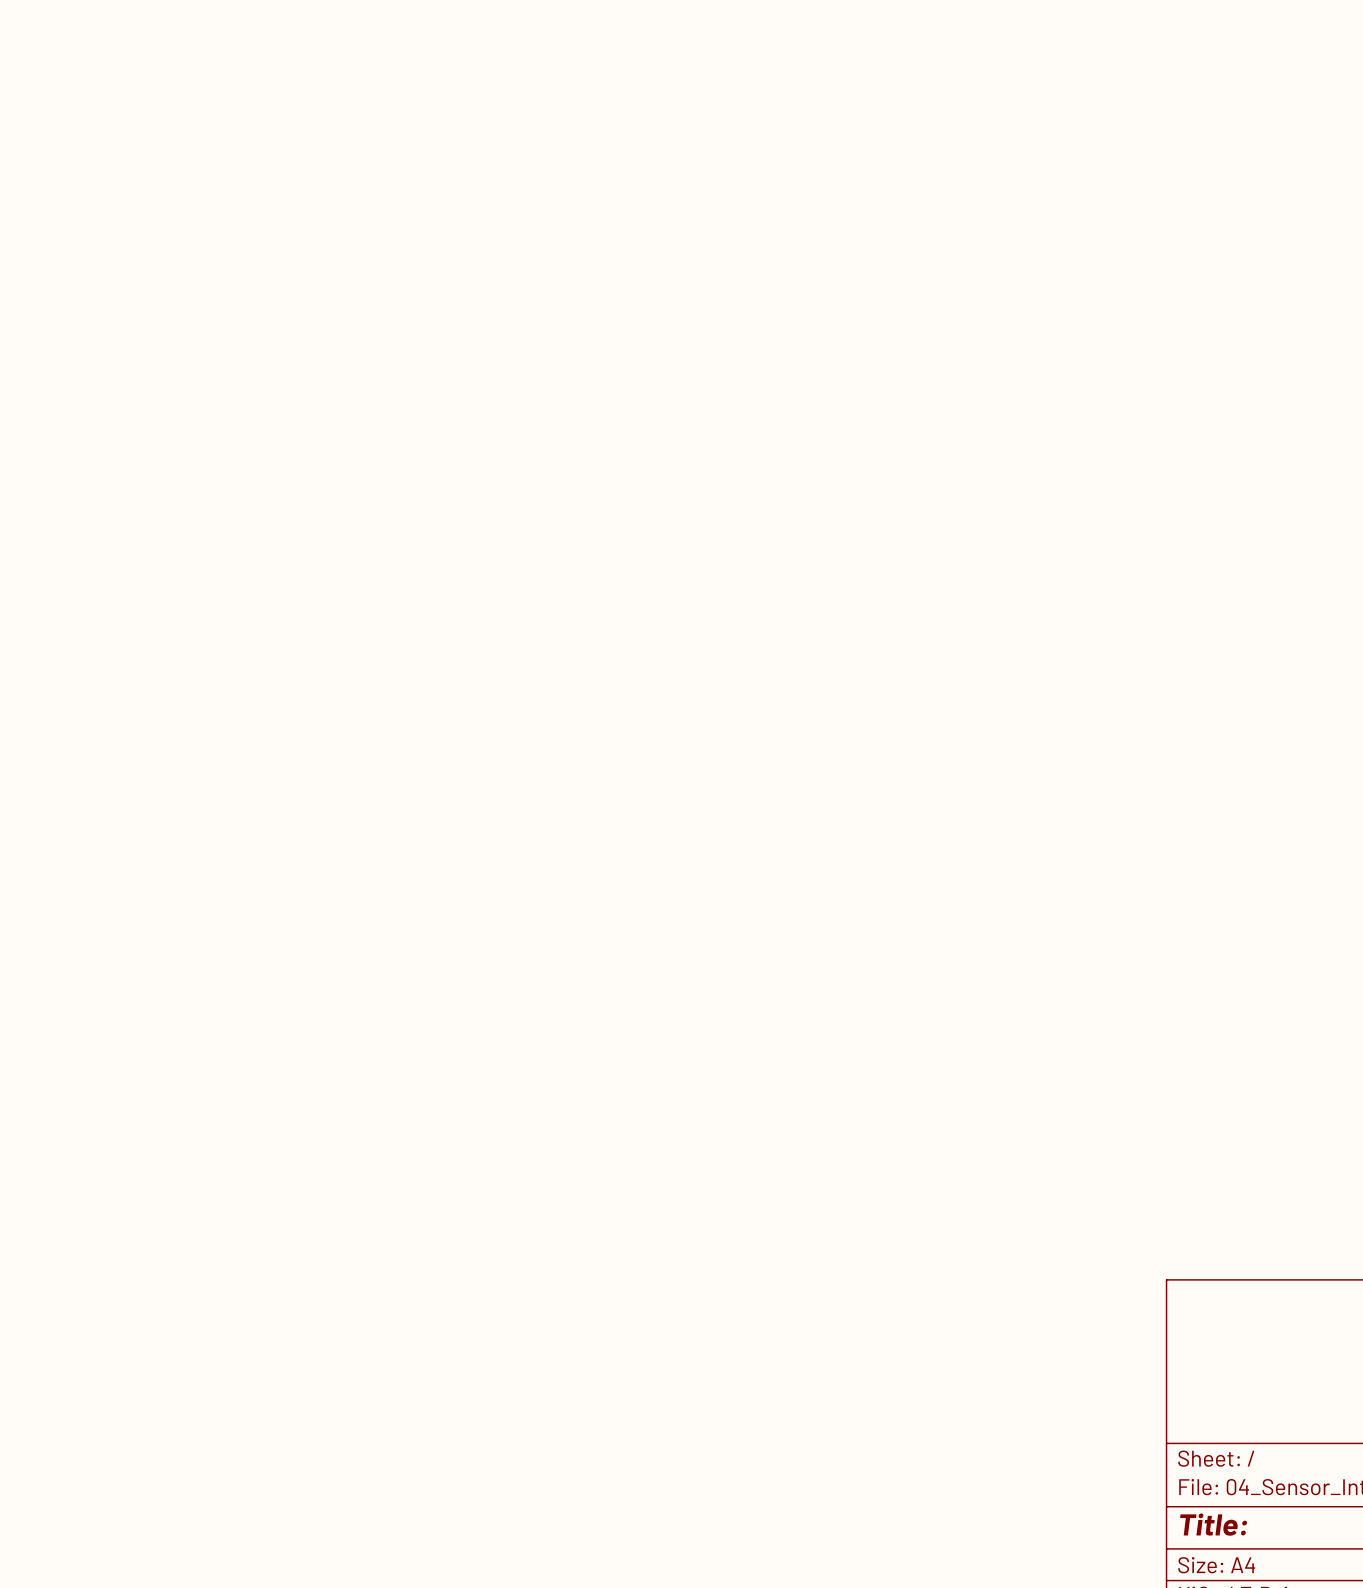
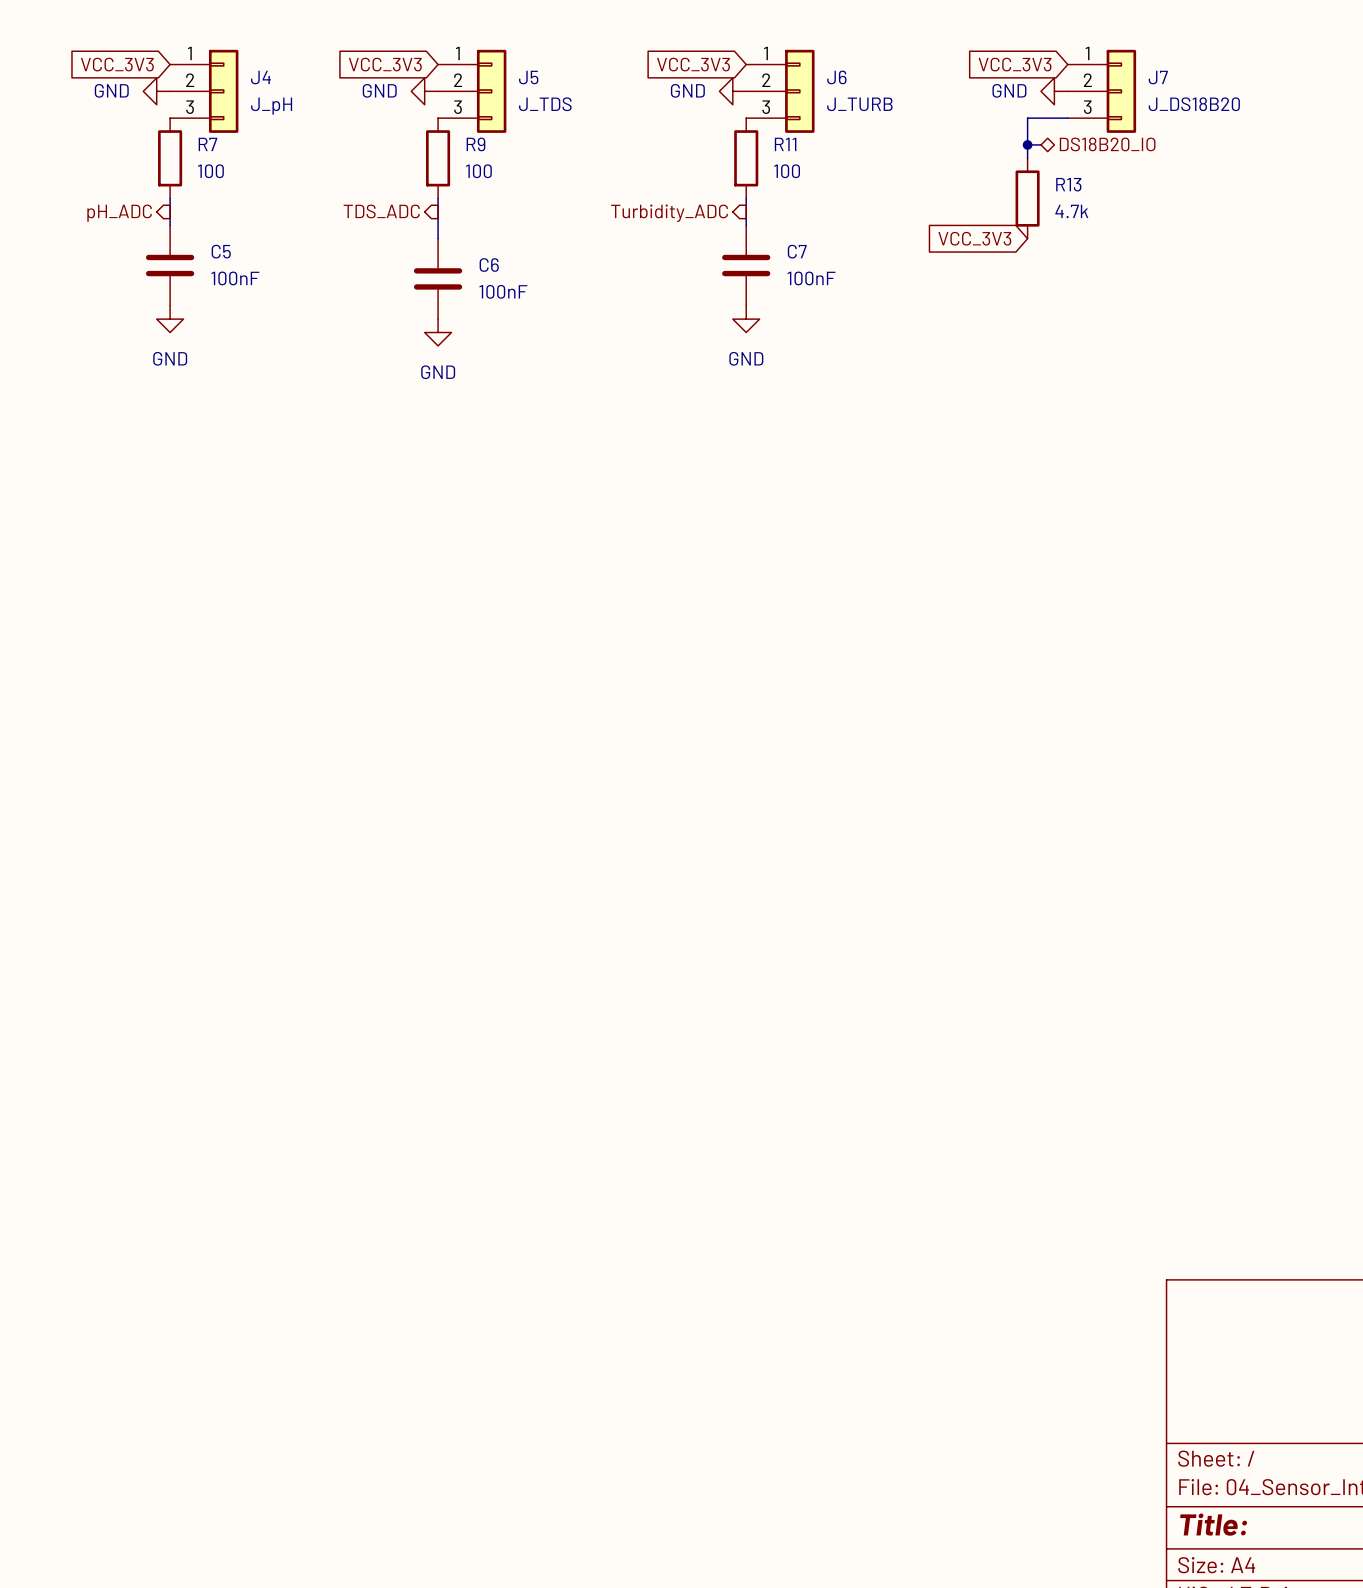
global label: none -> VCC_3V3 (117, 64)
global label: none -> VCC_3V3 (385, 64)
global label: none -> VCC_3V3 (693, 64)
global label: none -> VCC_3V3 (1015, 64)
power symbol: none -> GND (156, 91)
J4: none -> J_pH (204, 91)
power symbol: none -> GND (424, 91)
J5: none -> J_TDS (472, 91)
power symbol: none -> GND (732, 91)
J6: none -> J_TURB (780, 91)
power symbol: none -> GND (1054, 91)
J7: none -> J_DS18B20 (1101, 91)
wire: none -> (1067, 118) (1027, 118) (1027, 158)
wire: none -> (1027, 144) (1040, 144)
junction: none -> (1027, 144)
hierarchical label: none -> DS18B20_IO (1107, 144)
R7: none -> 100 (170, 158)
R9: none -> 100 (438, 158)
R11: none -> 100 (746, 158)
wire: none -> (170, 198) (170, 225)
wire: none -> (438, 198) (438, 238)
wire: none -> (746, 198) (746, 225)
R13: none -> 4.7k (1027, 198)
hierarchical label: none -> TDS_ADC (381, 211)
hierarchical label: none -> pH_ADC (119, 213)
hierarchical label: none -> Turbidity_ADC (669, 213)
global label: none -> VCC_3V3 (974, 238)
C5: none -> 100nF (170, 265)
C7: none -> 100nF (746, 265)
C6: none -> 100nF (438, 278)
power symbol: none -> GND (170, 319)
power symbol: none -> GND (746, 319)
power symbol: none -> GND (438, 332)

